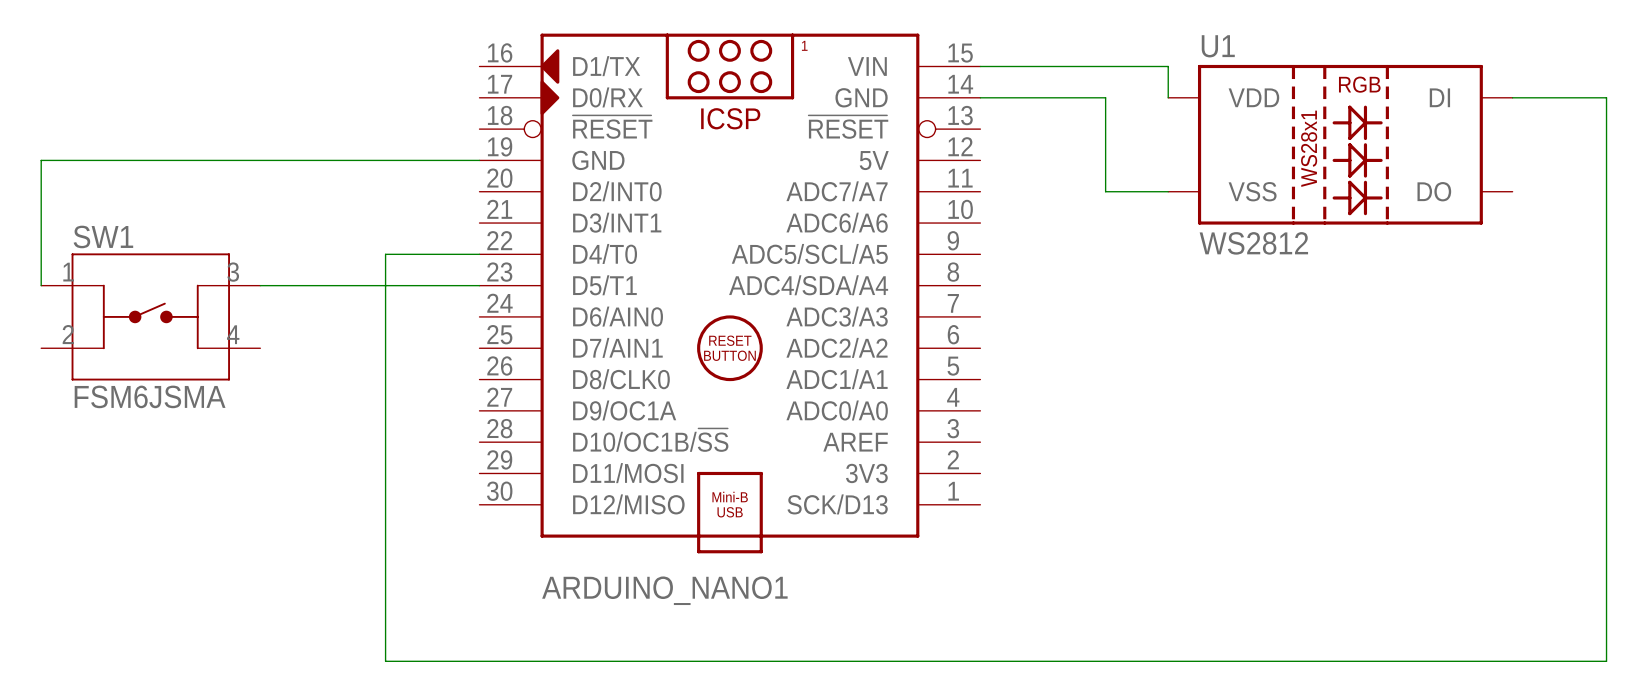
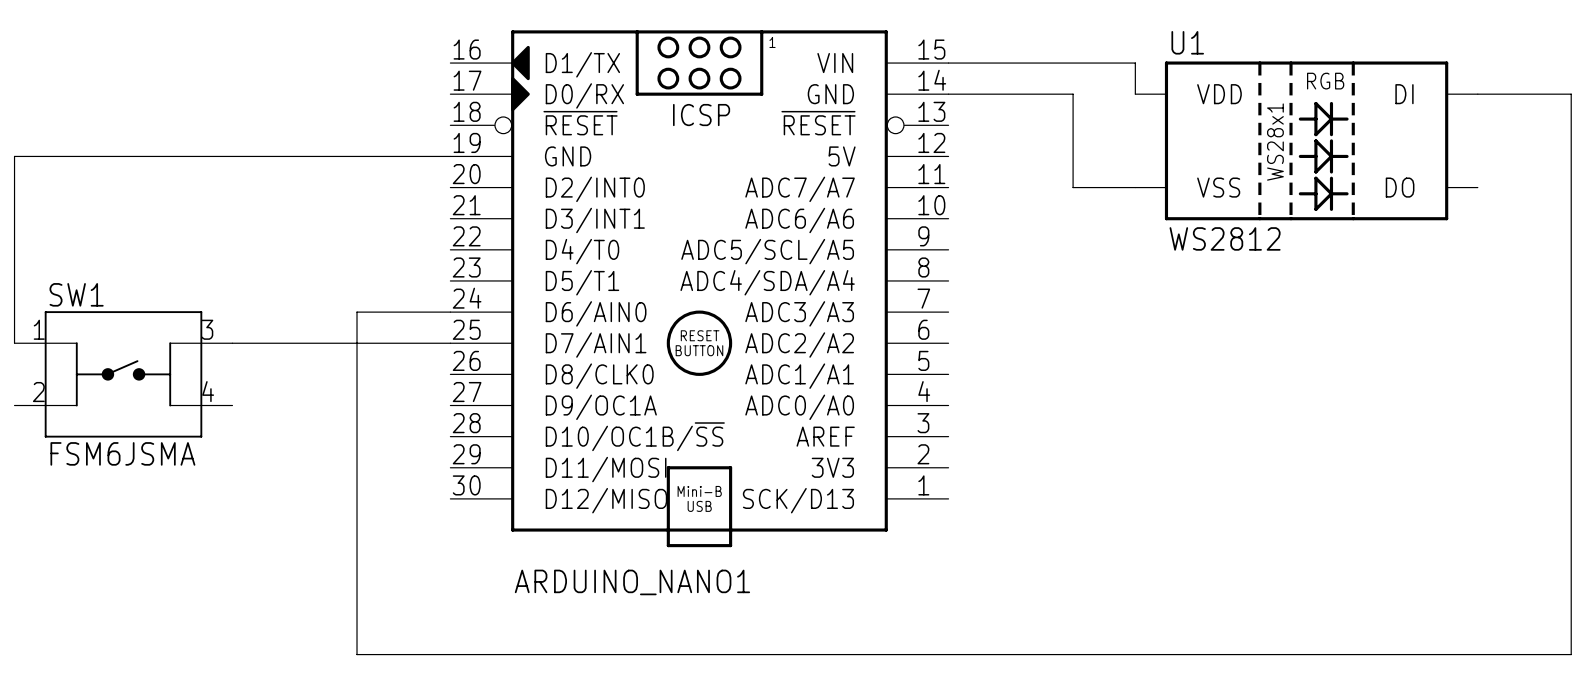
wire: (479, 254) (385, 254) (385, 316) -> (450, 312) (357, 312)
wire: none -> (14, 280) (14, 343)
wire: (260, 285) (479, 285) -> (232, 343) (450, 343)
SW1 position: (150, 316) -> (123, 374)

